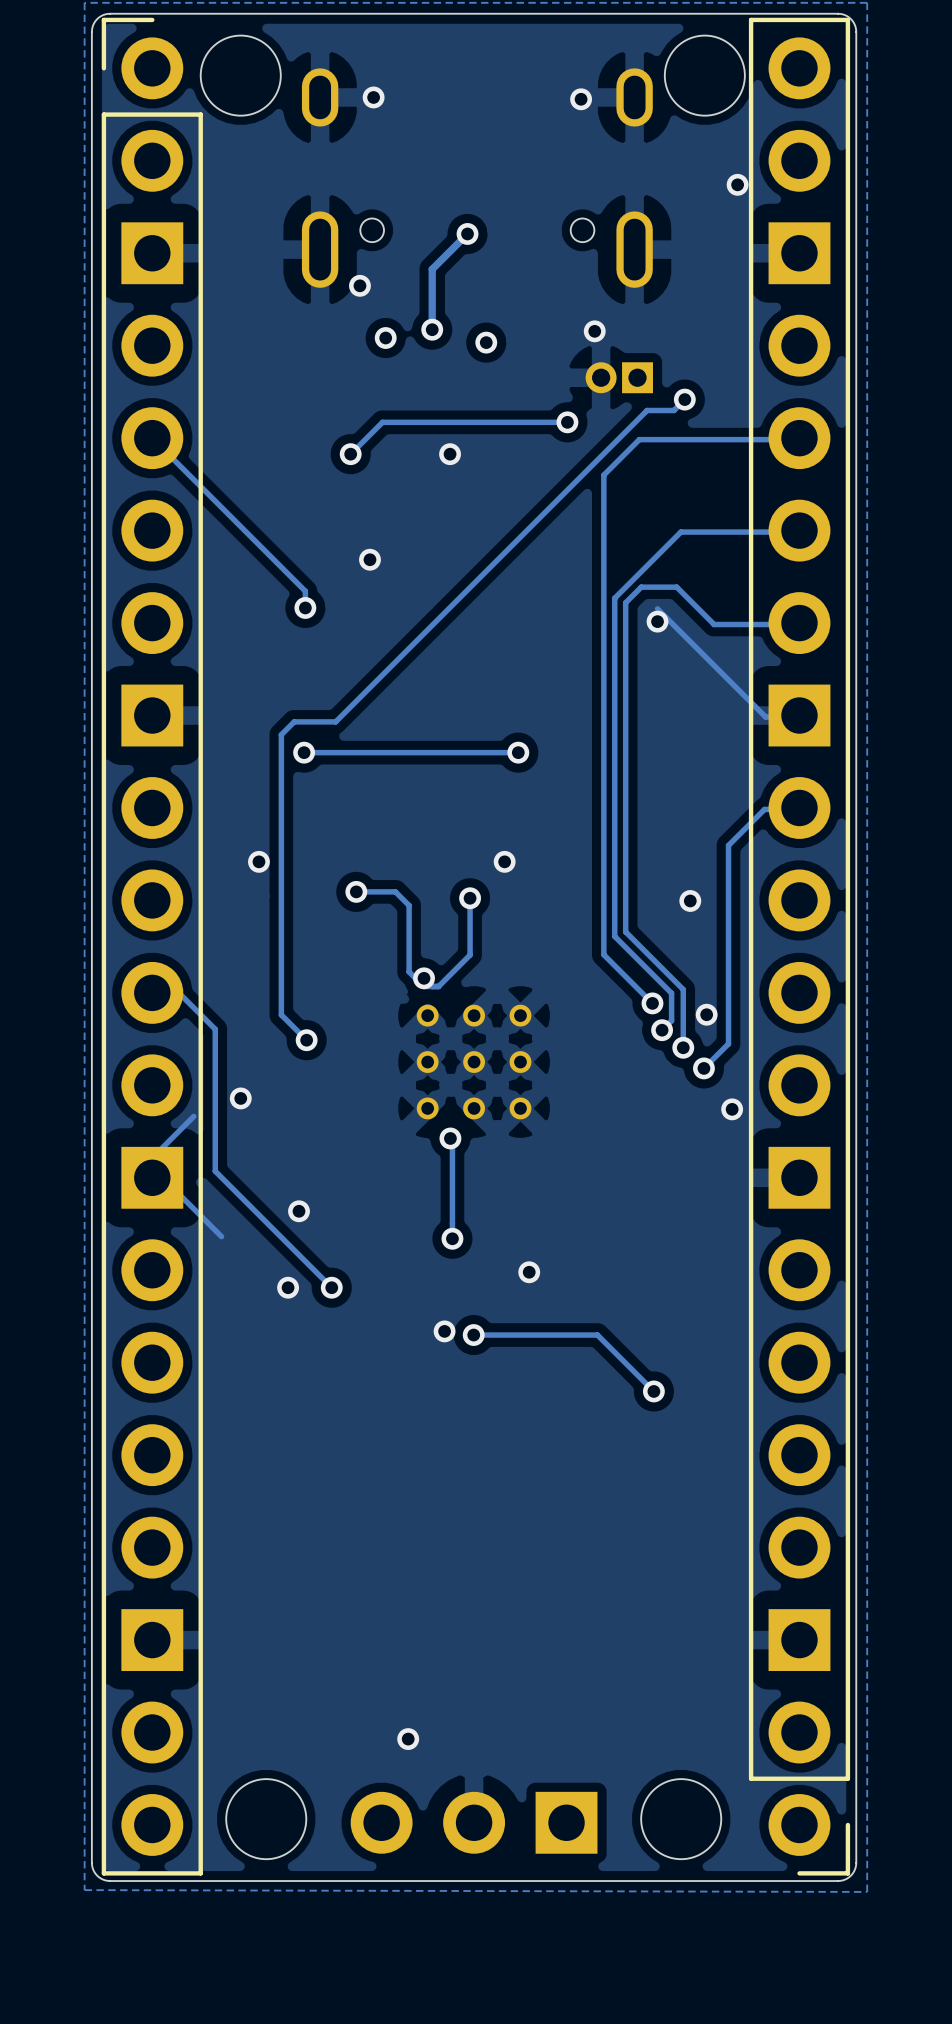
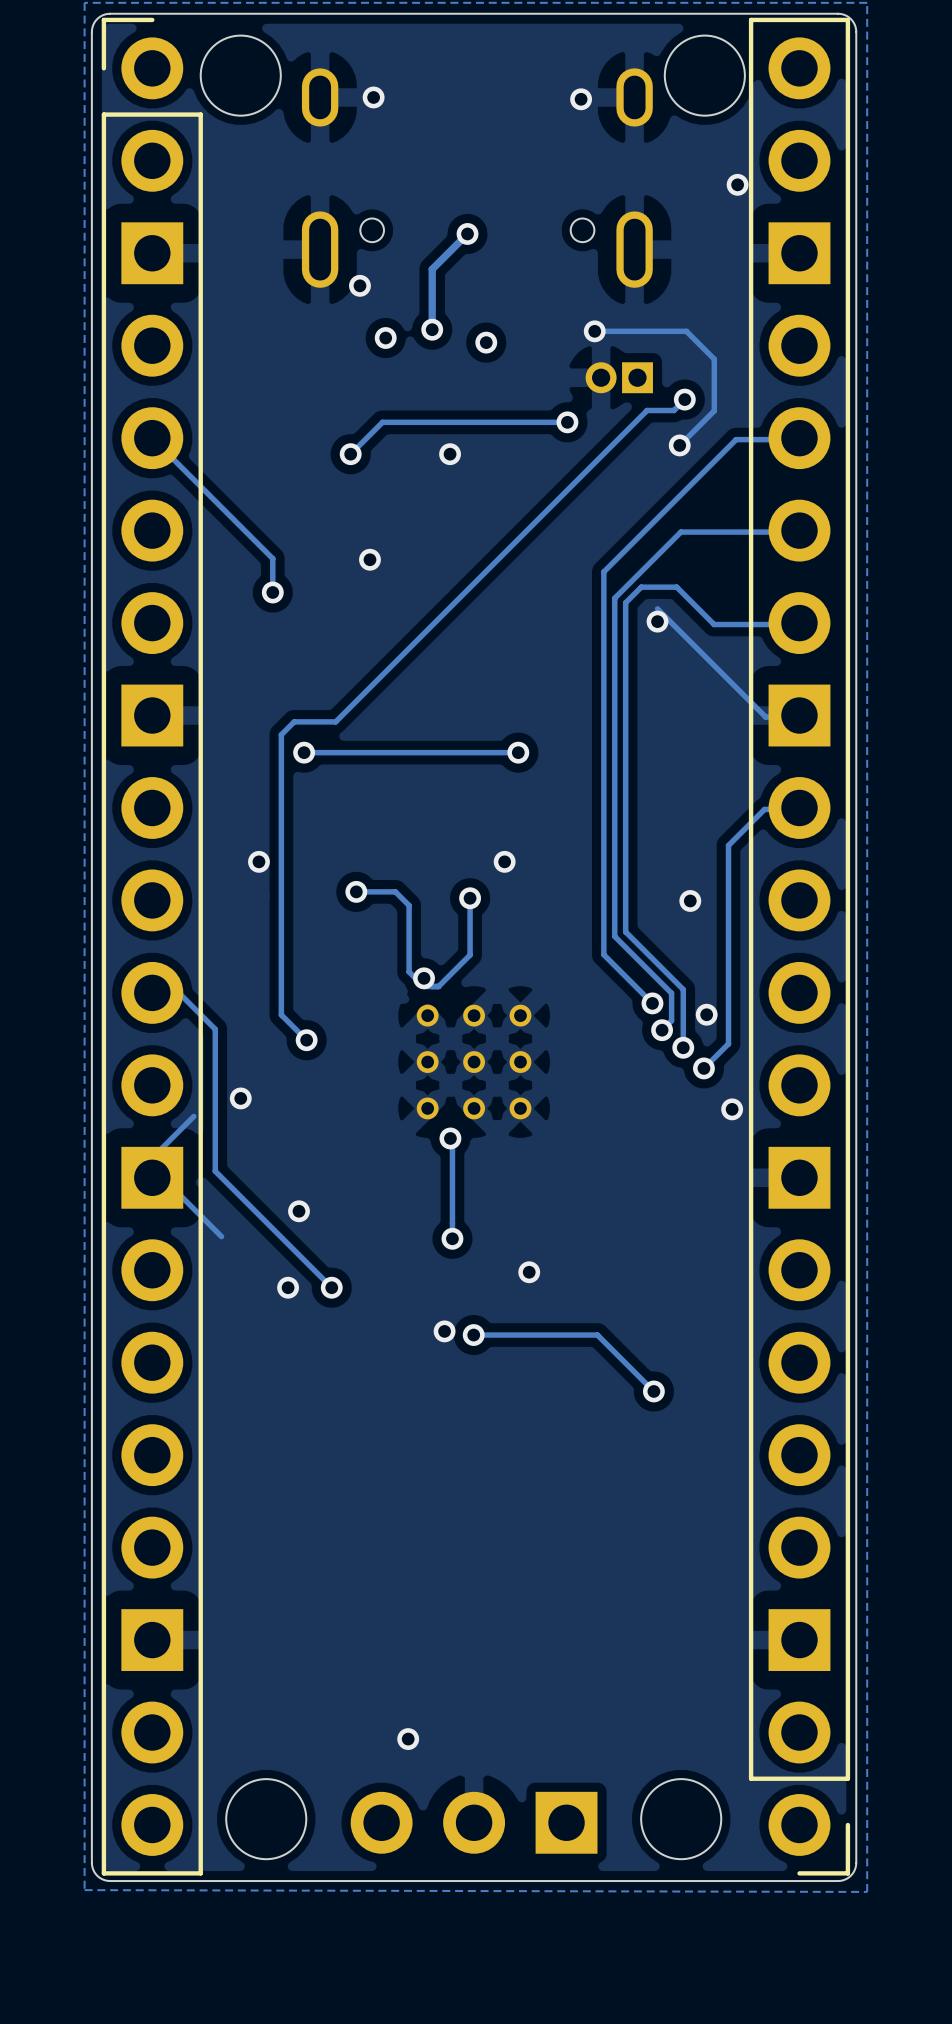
track: none -> (594, 331) (686, 331) (714, 359) (714, 410) (679, 445)
track: (736, 439) (639, 439) (603, 475) (603, 571) -> (736, 439) (603, 571)
via: none -> (679, 445)
track: (272, 558) (305, 591) (305, 607) -> (272, 558) (272, 592)
via position: (305, 607) -> (272, 592)

